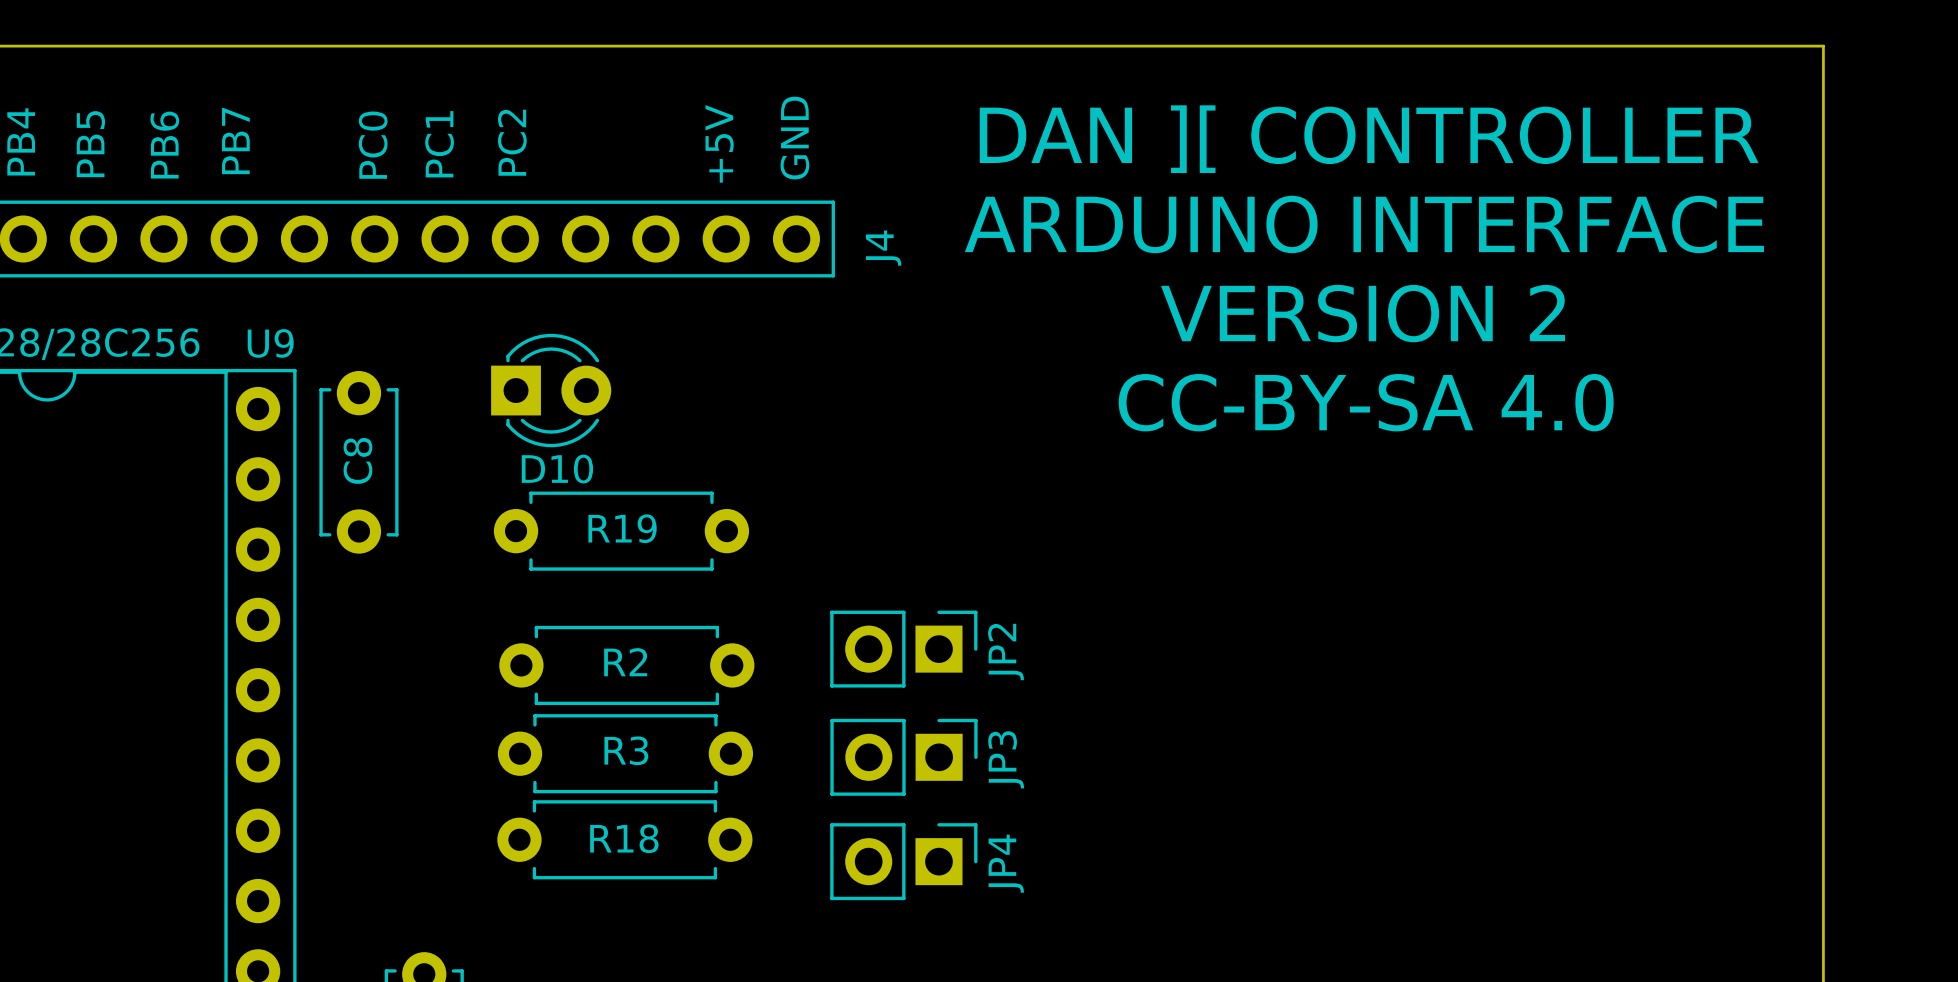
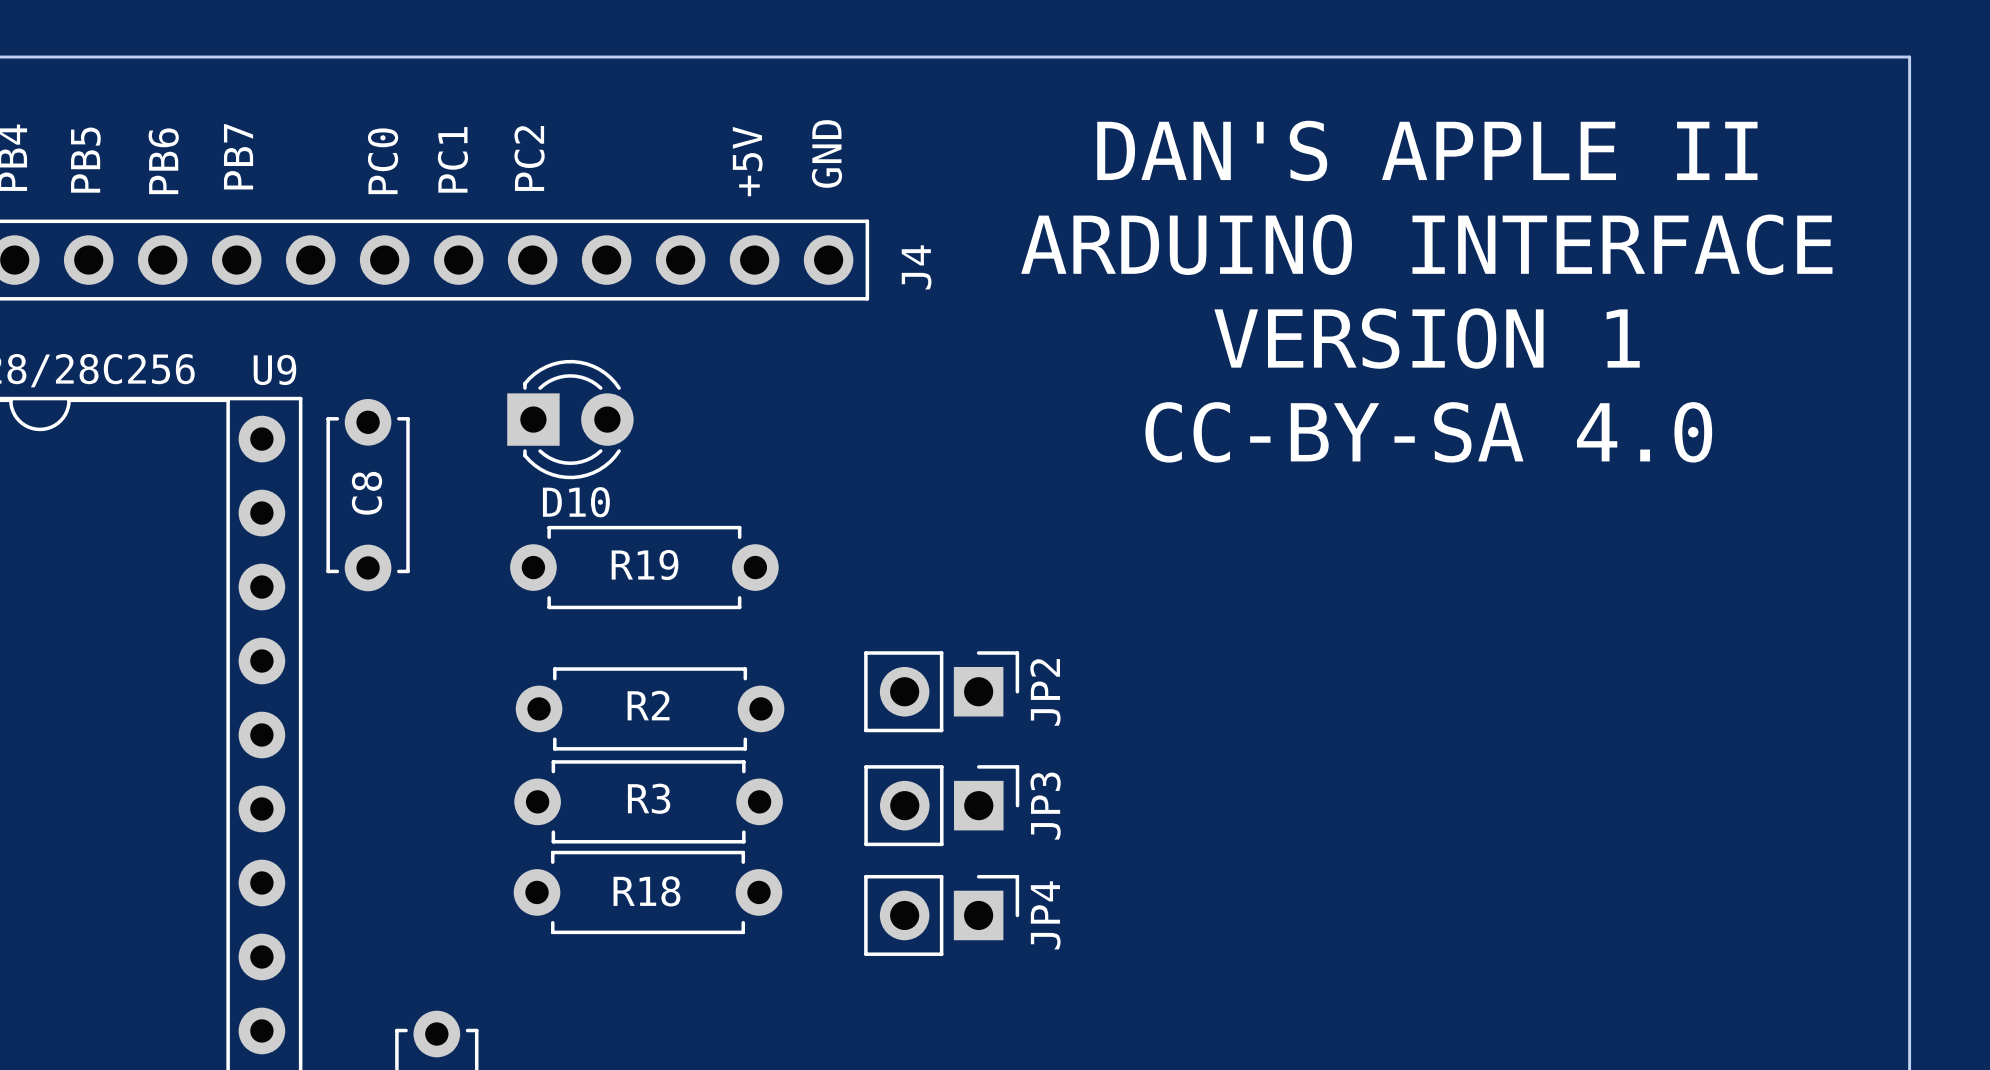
text: DAN ][ CONTROLLER (1369, 139) -> DAN'S APPLE II (1427, 150)
text: VERSION 2 (1363, 313) -> VERSION 1 (1427, 338)

